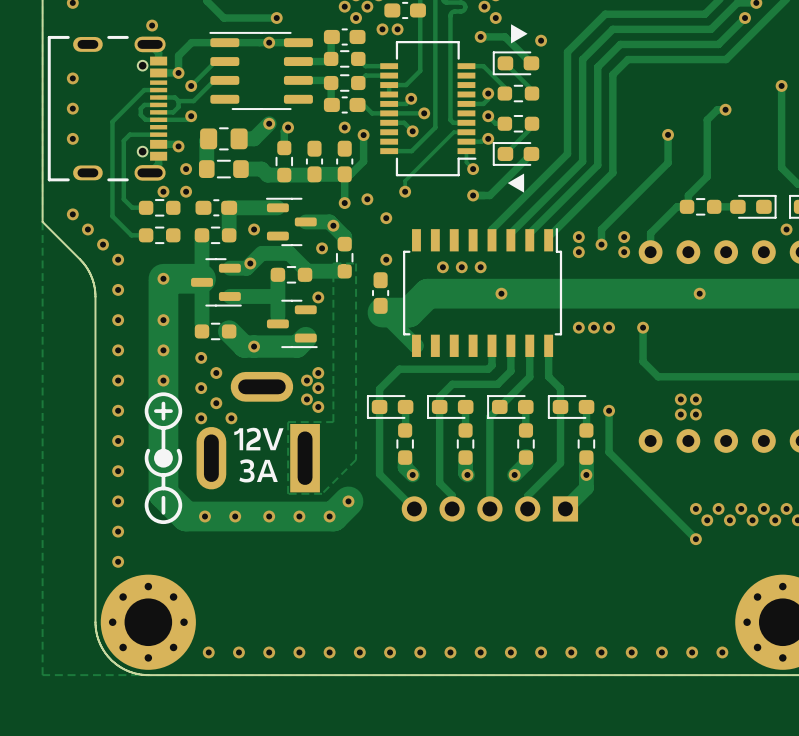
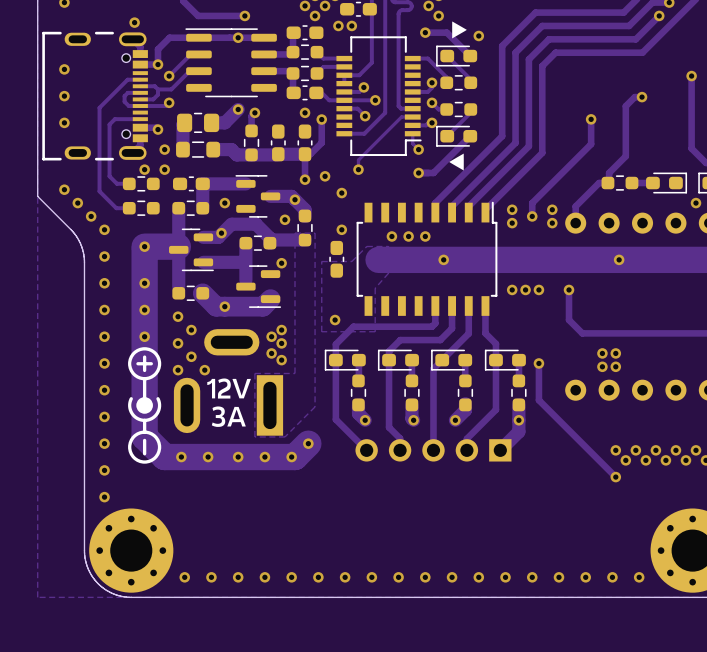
zone outline: none -> (366, 246) (351, 261) (321, 261) (321, 331) (375, 331) (375, 288) (388, 273) (388, 246) (366, 246)
track: (415, 305) (427, 293) (408, 312) (382, 312) (416, 345) -> none
via: none -> (335, 320)

